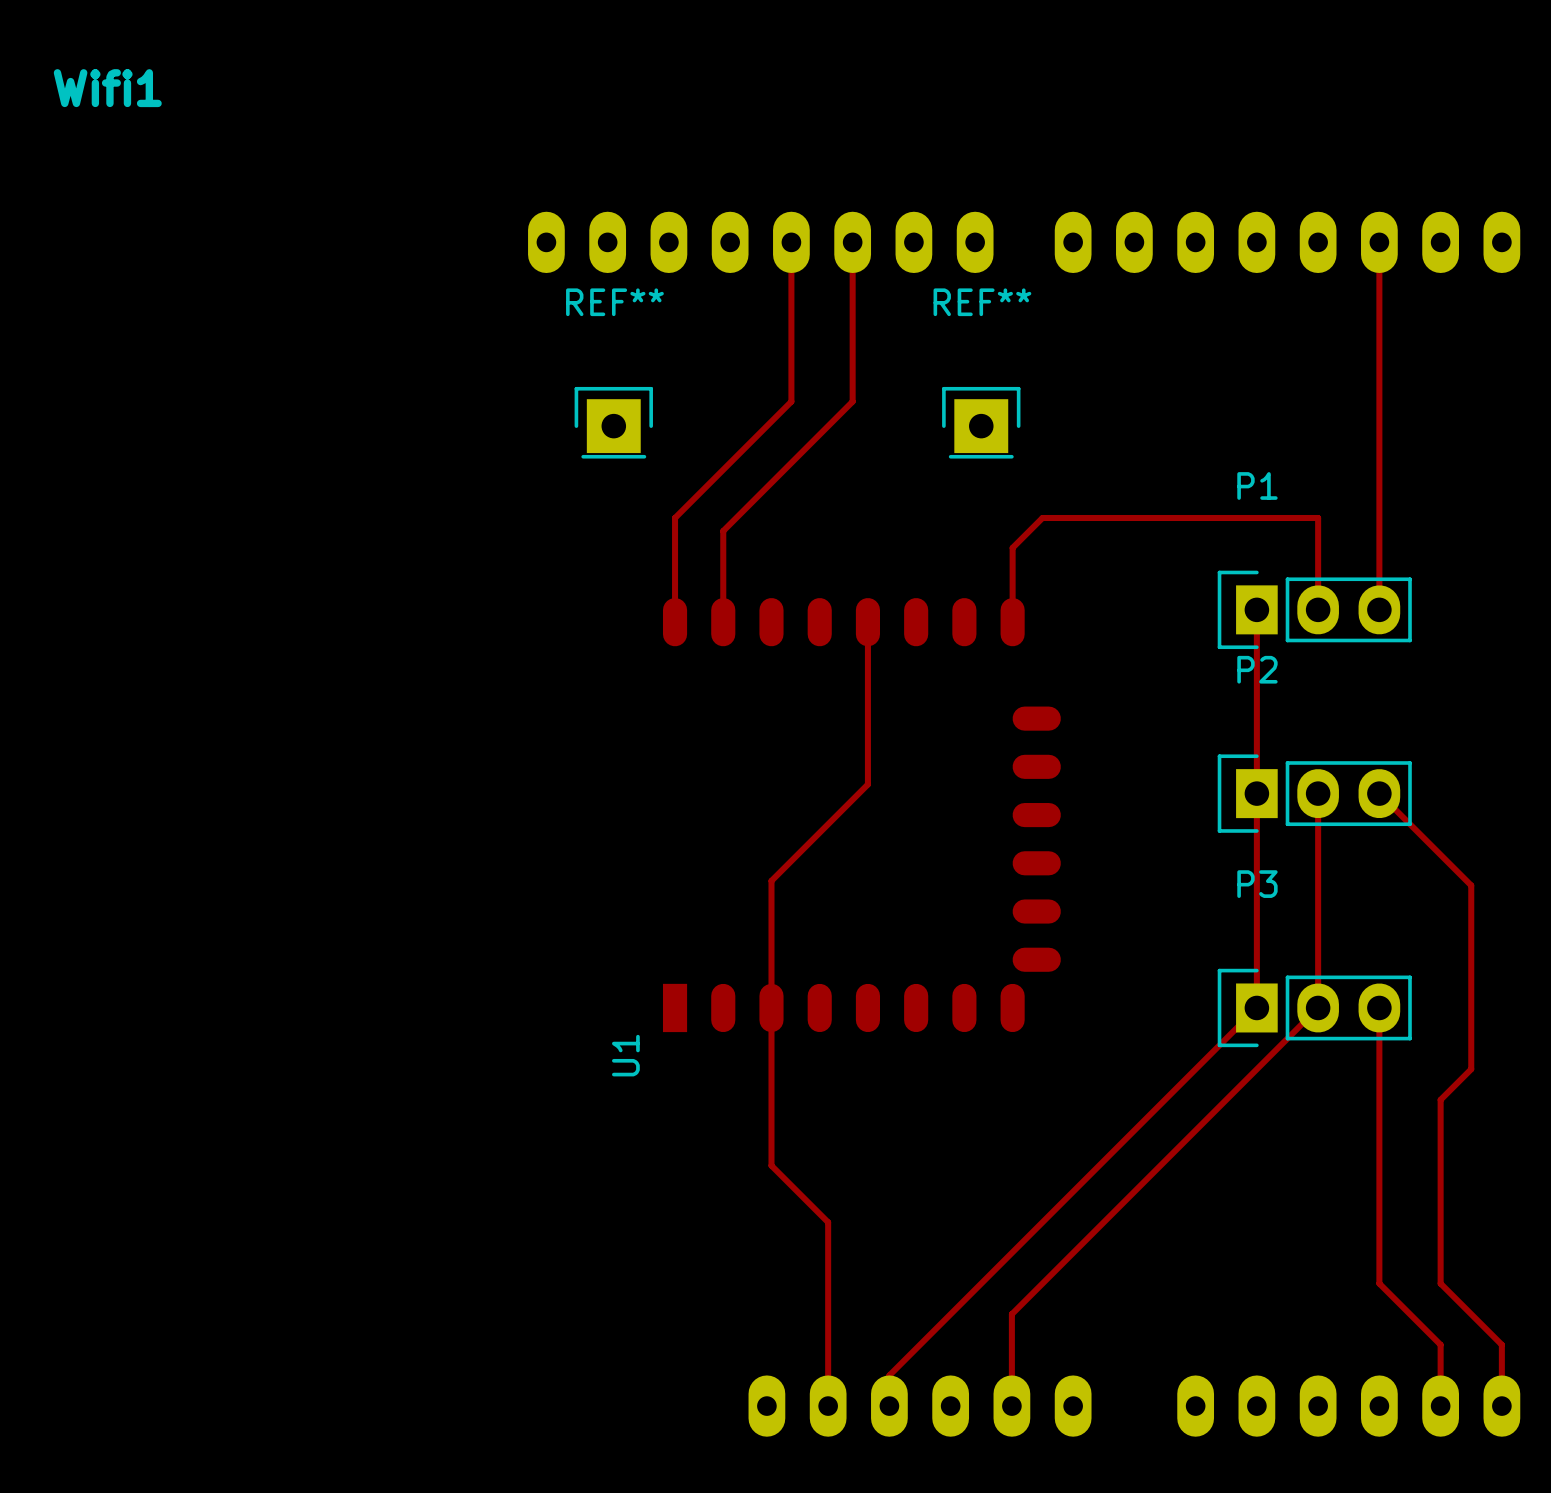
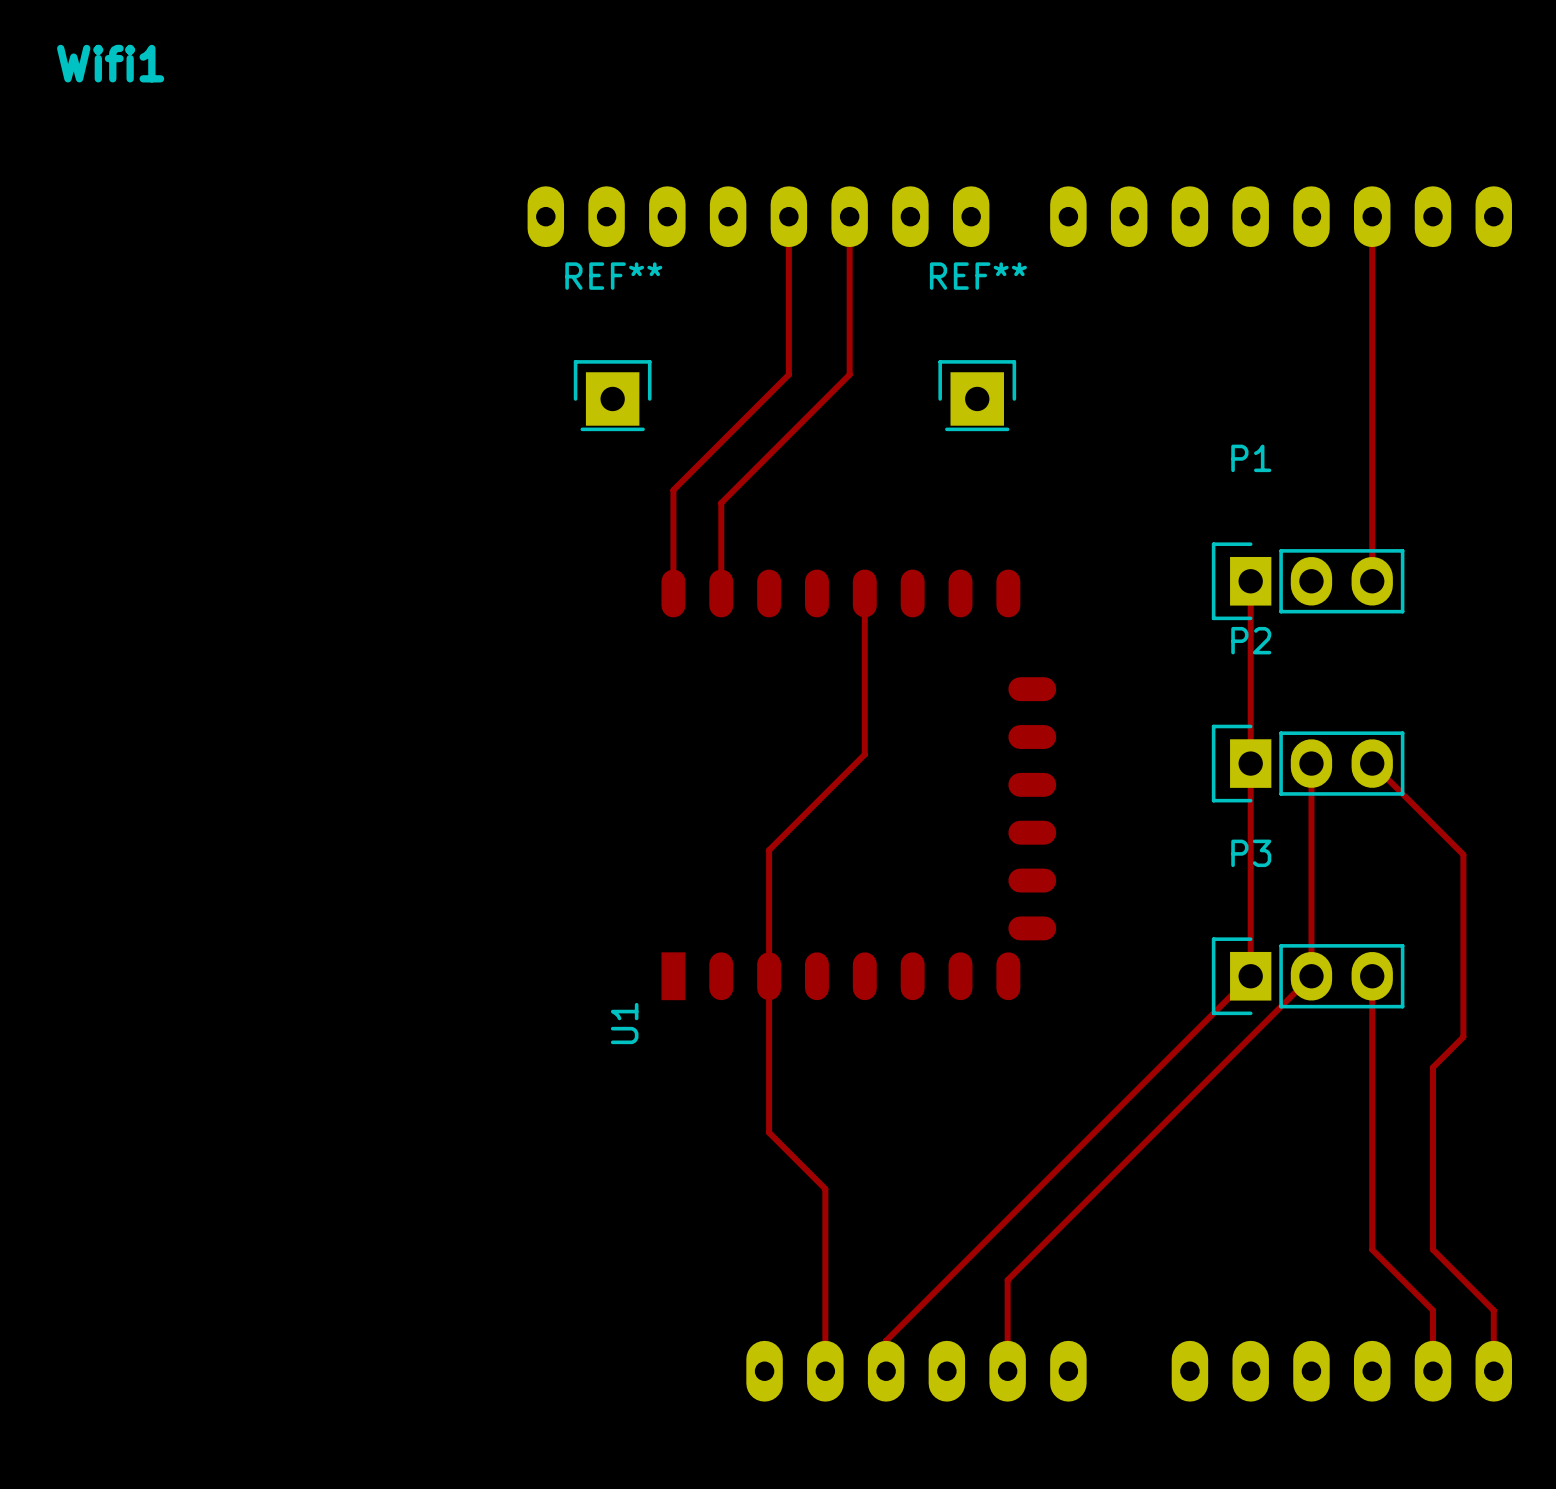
top track: (1318, 609) (1318, 517) (1042, 517) (1012, 547) (1012, 622) -> none

